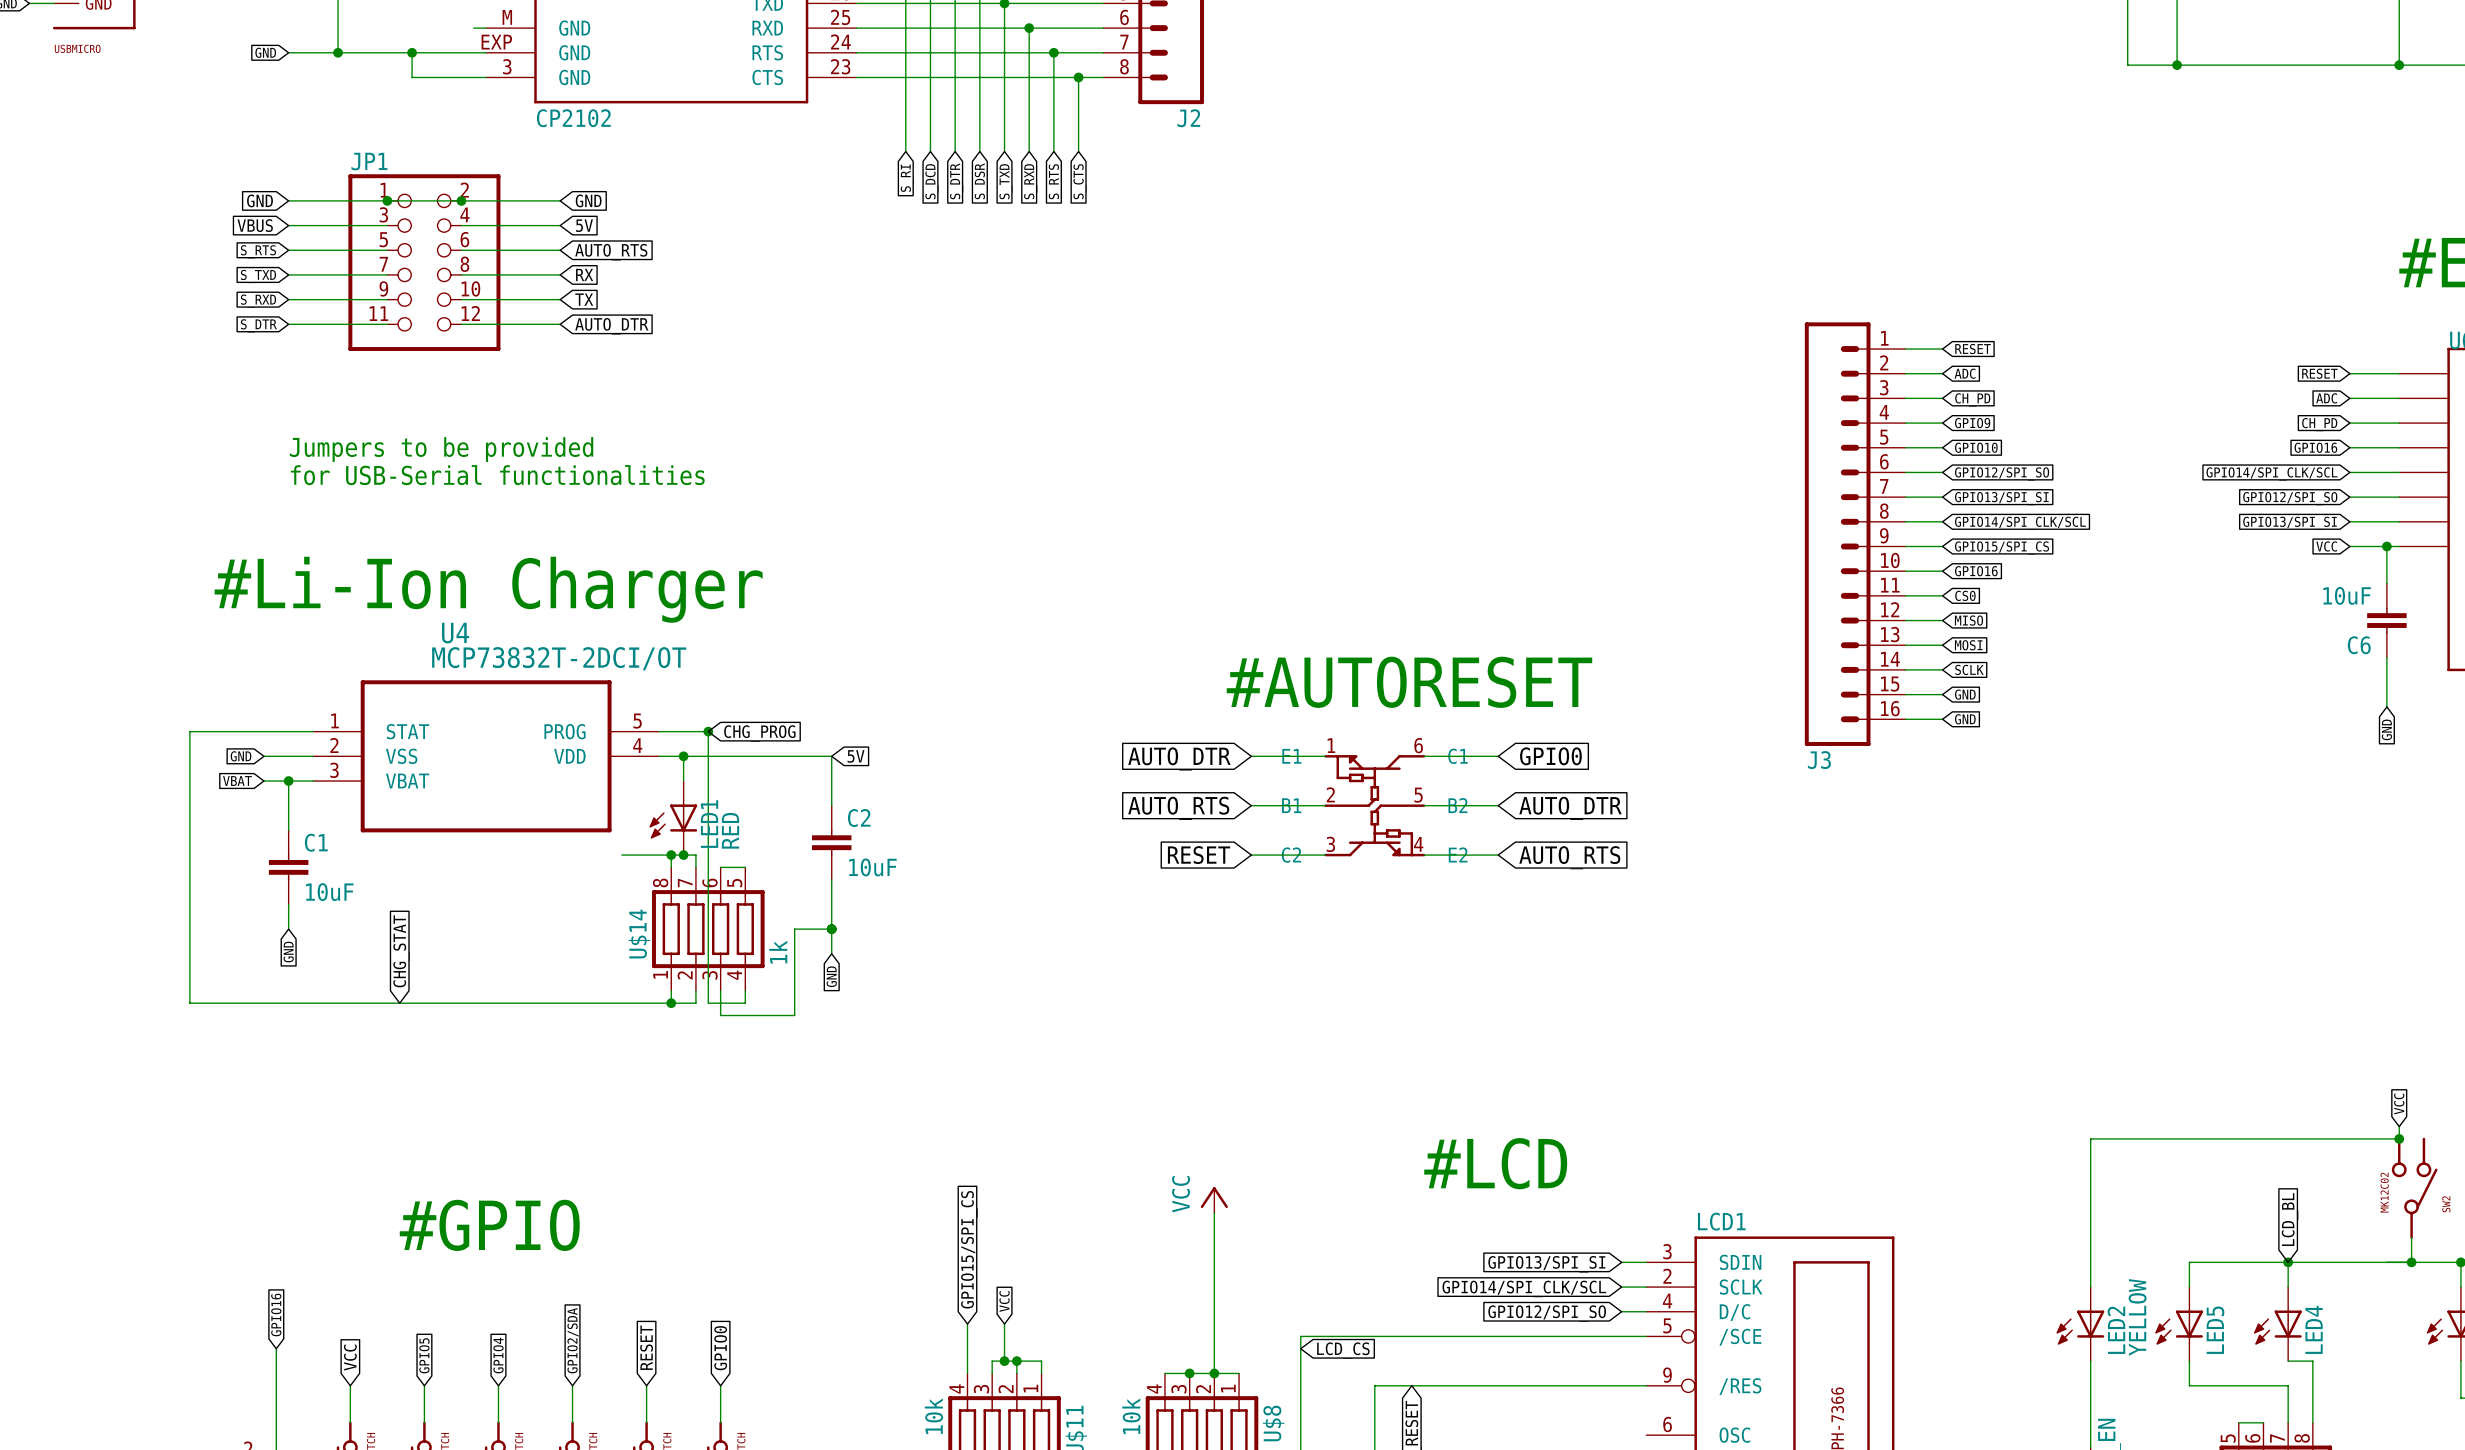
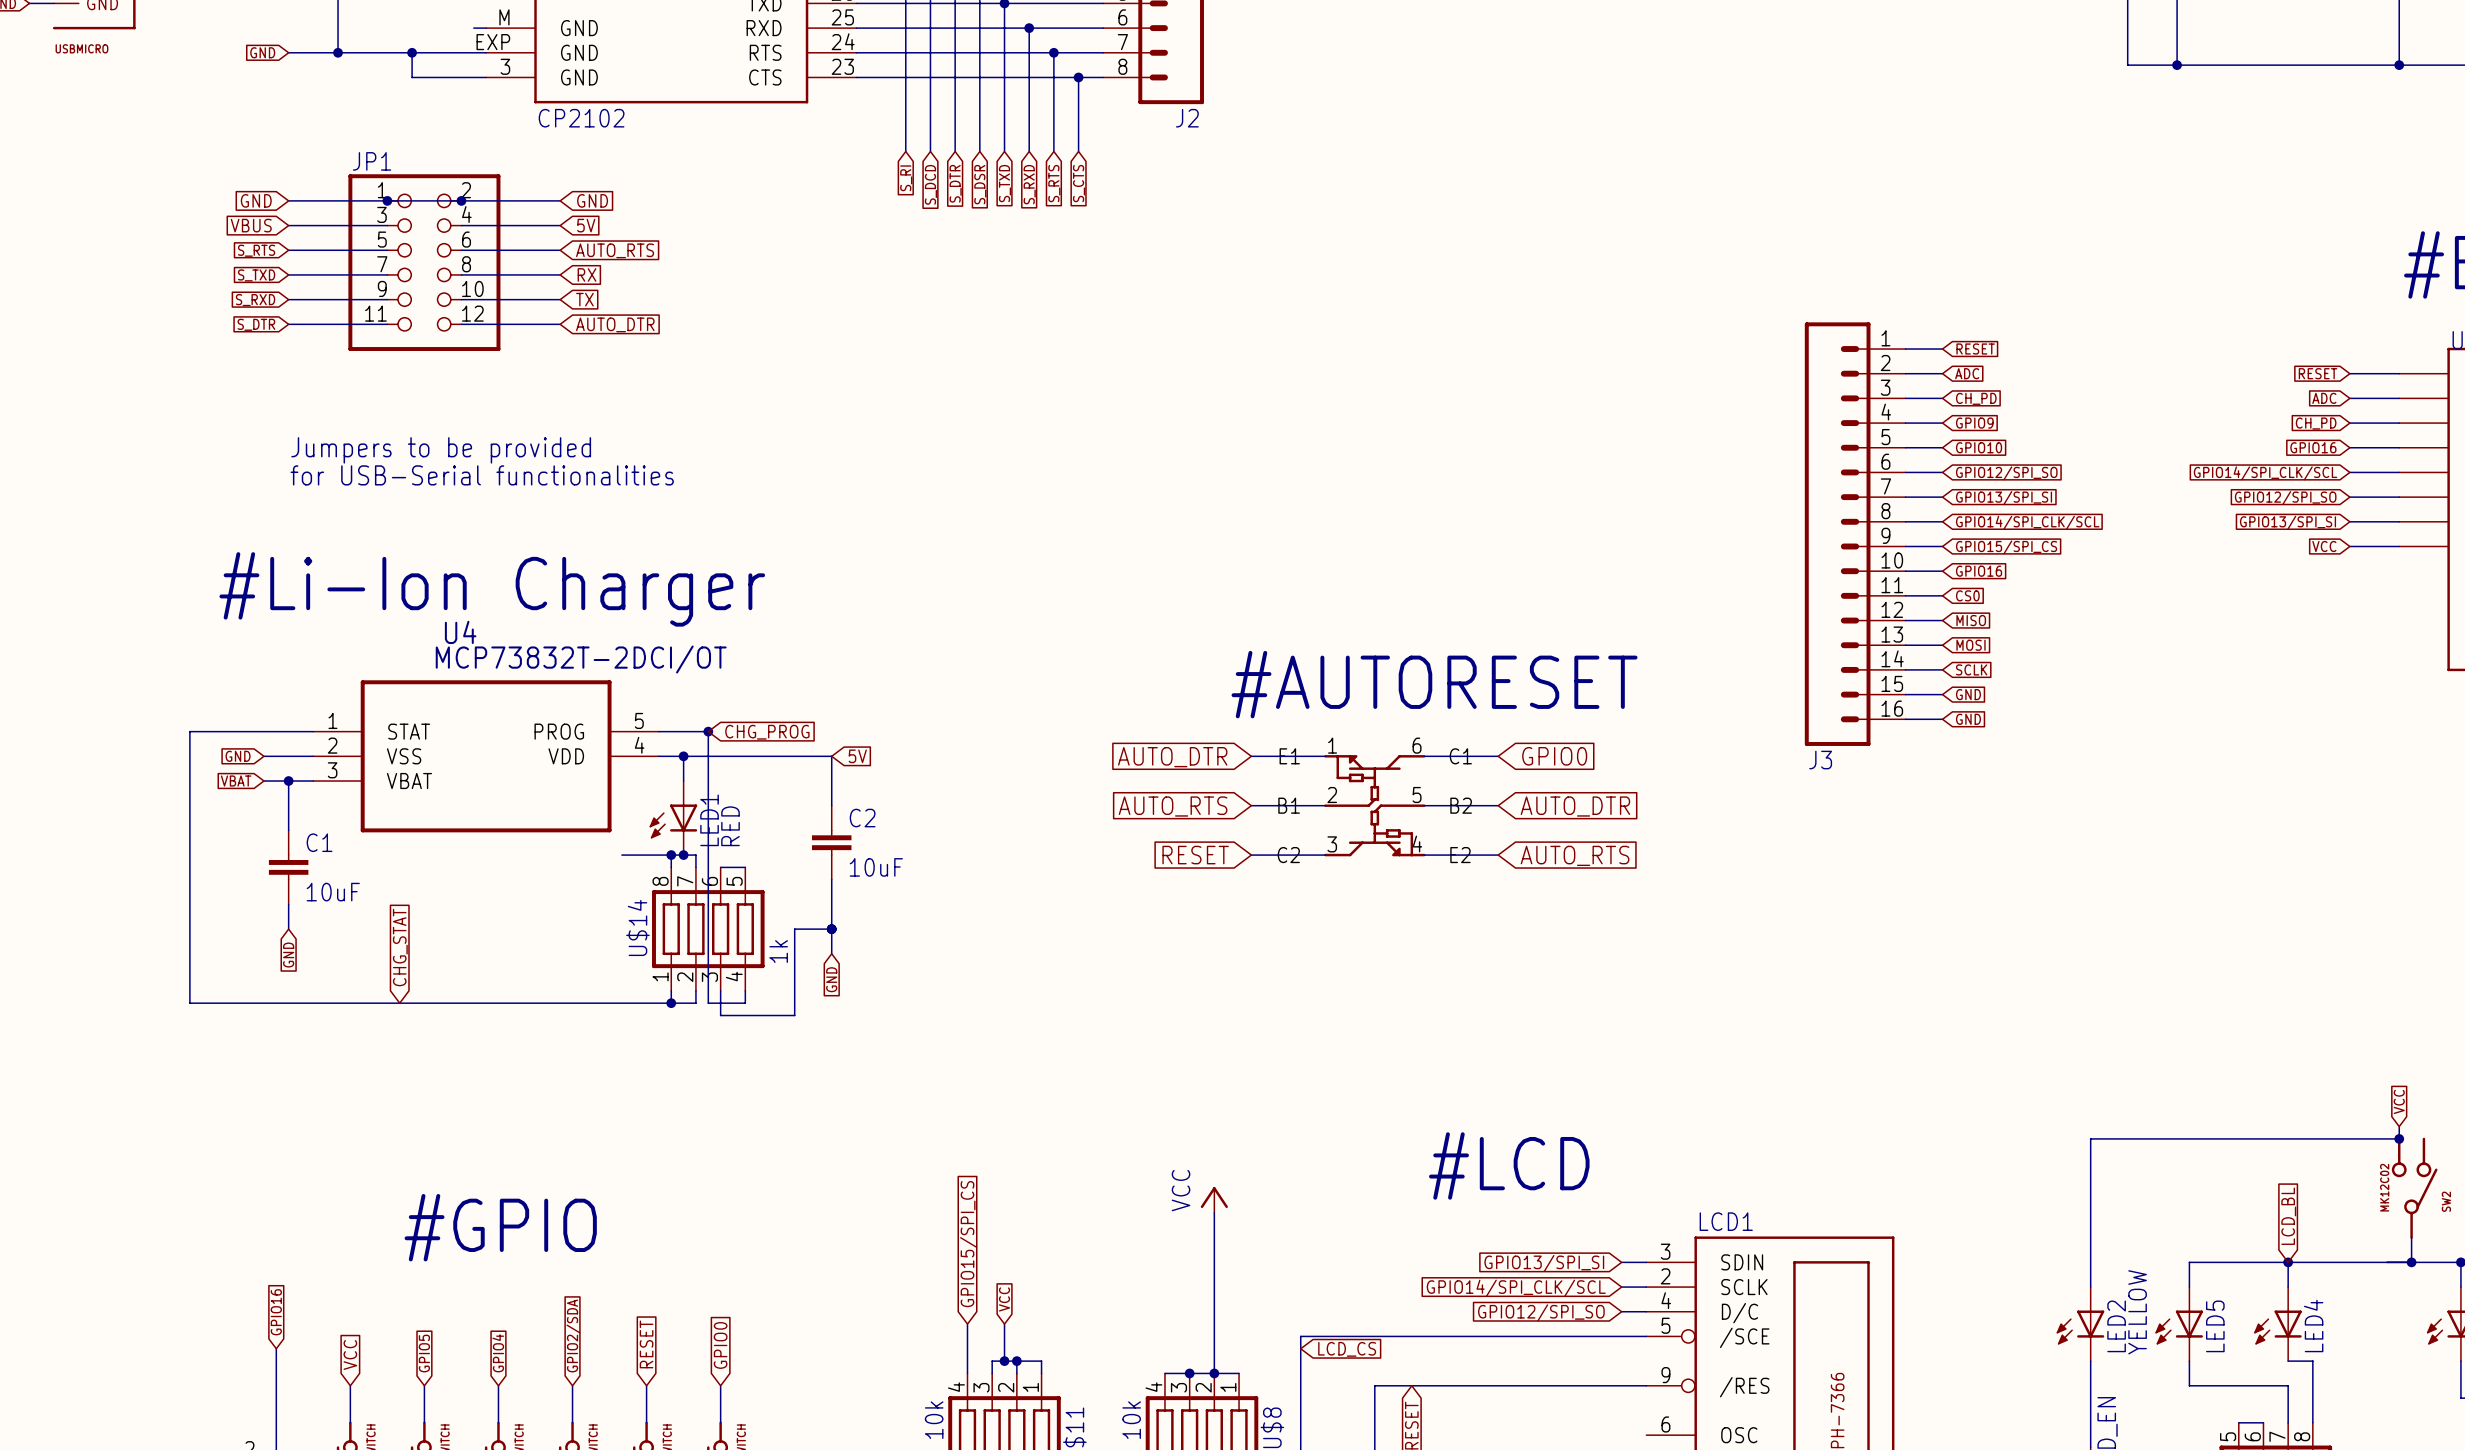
wire: (2386, 546) (2386, 583) -> none
junction: (2386, 546) -> none
C6: 10uF (2386, 620) -> none
wire: (2386, 657) (2386, 706) -> none
global label: GND (2386, 729) -> none

